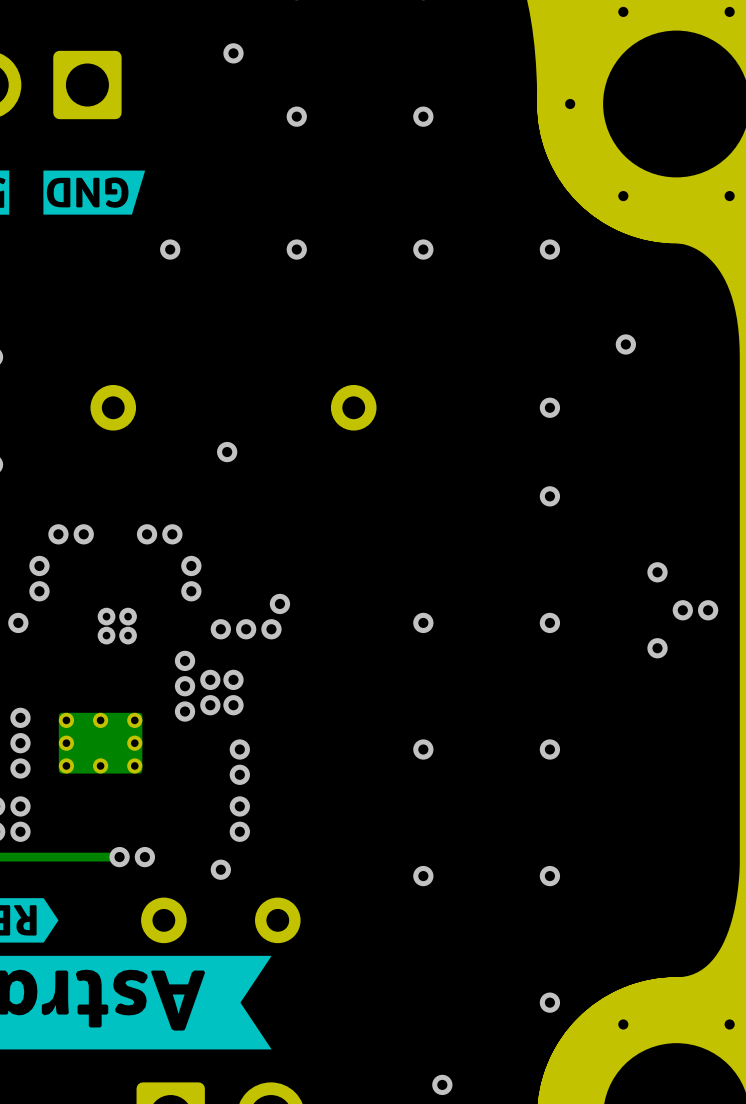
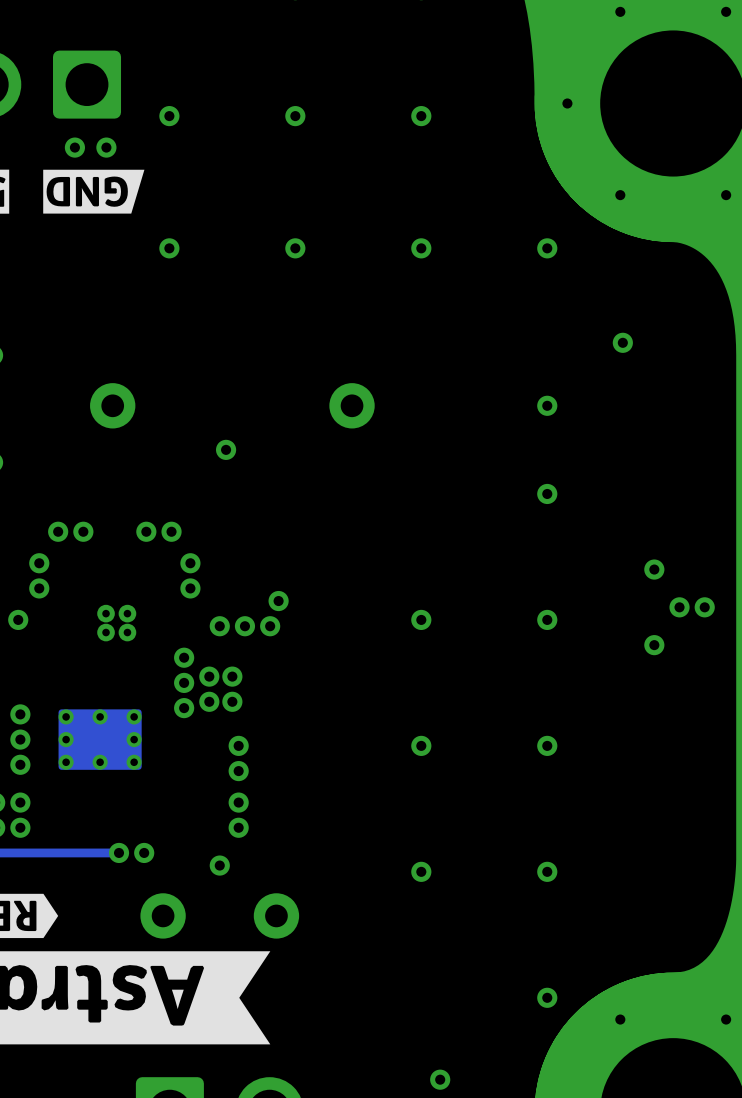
via: (233, 53) -> none
via: none -> (169, 116)
via: none -> (74, 147)
via: none -> (106, 147)

